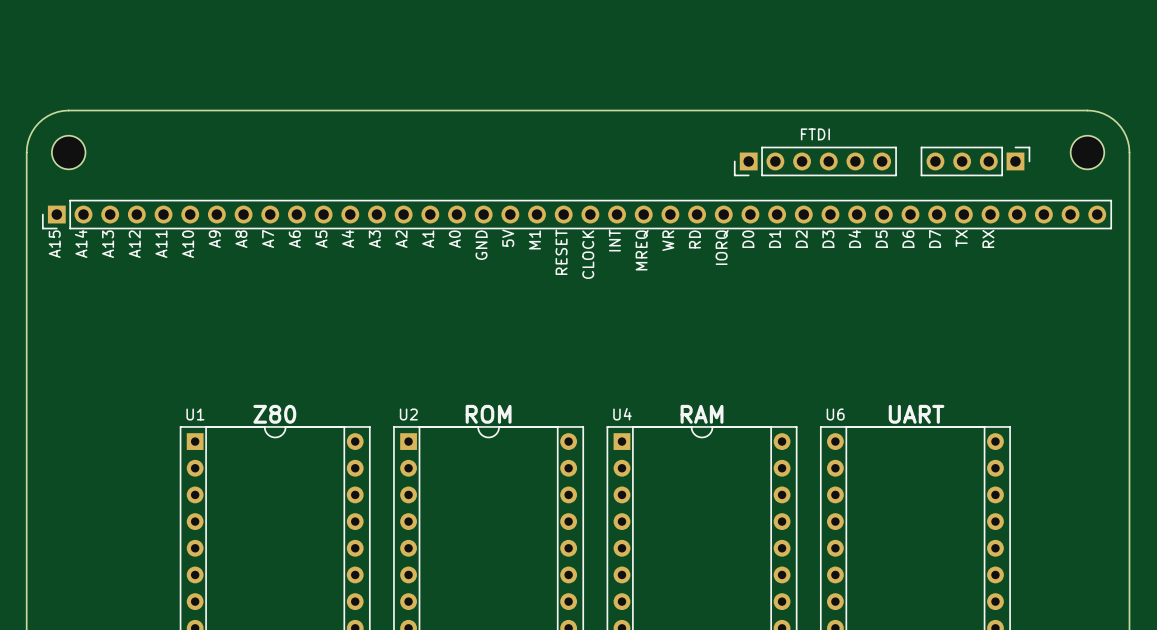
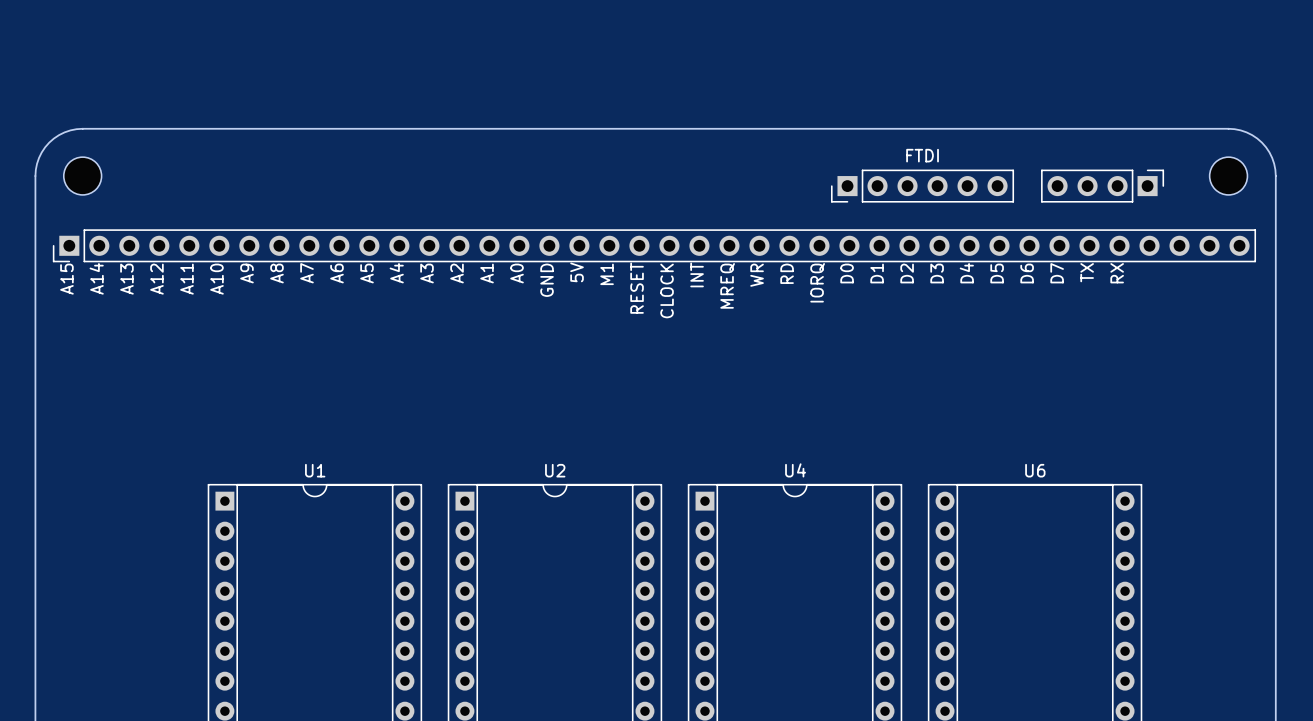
U1 name position: U1 (195, 414) -> U1 (315, 470)
text: Z80 (274, 414) -> none
U2 name position: U2 (408, 414) -> U2 (555, 470)
text: ROM (488, 414) -> none
U4 name position: U4 (622, 414) -> U4 (795, 470)
text: RAM (702, 414) -> none
U6 name position: U6 (835, 414) -> U6 (1035, 470)
text: UART (916, 414) -> none

